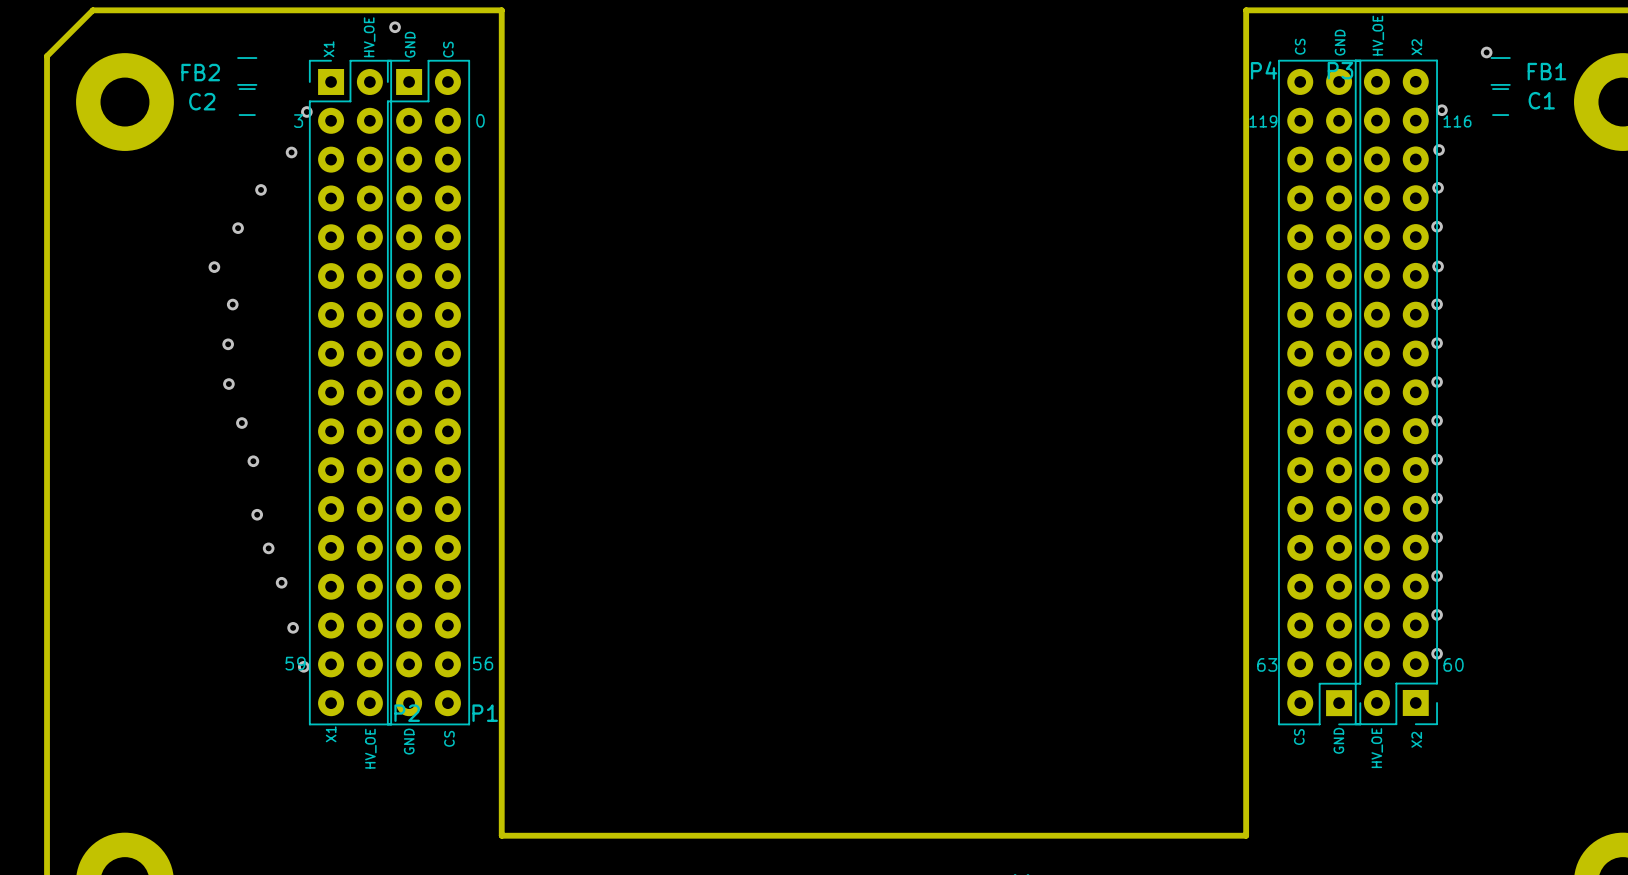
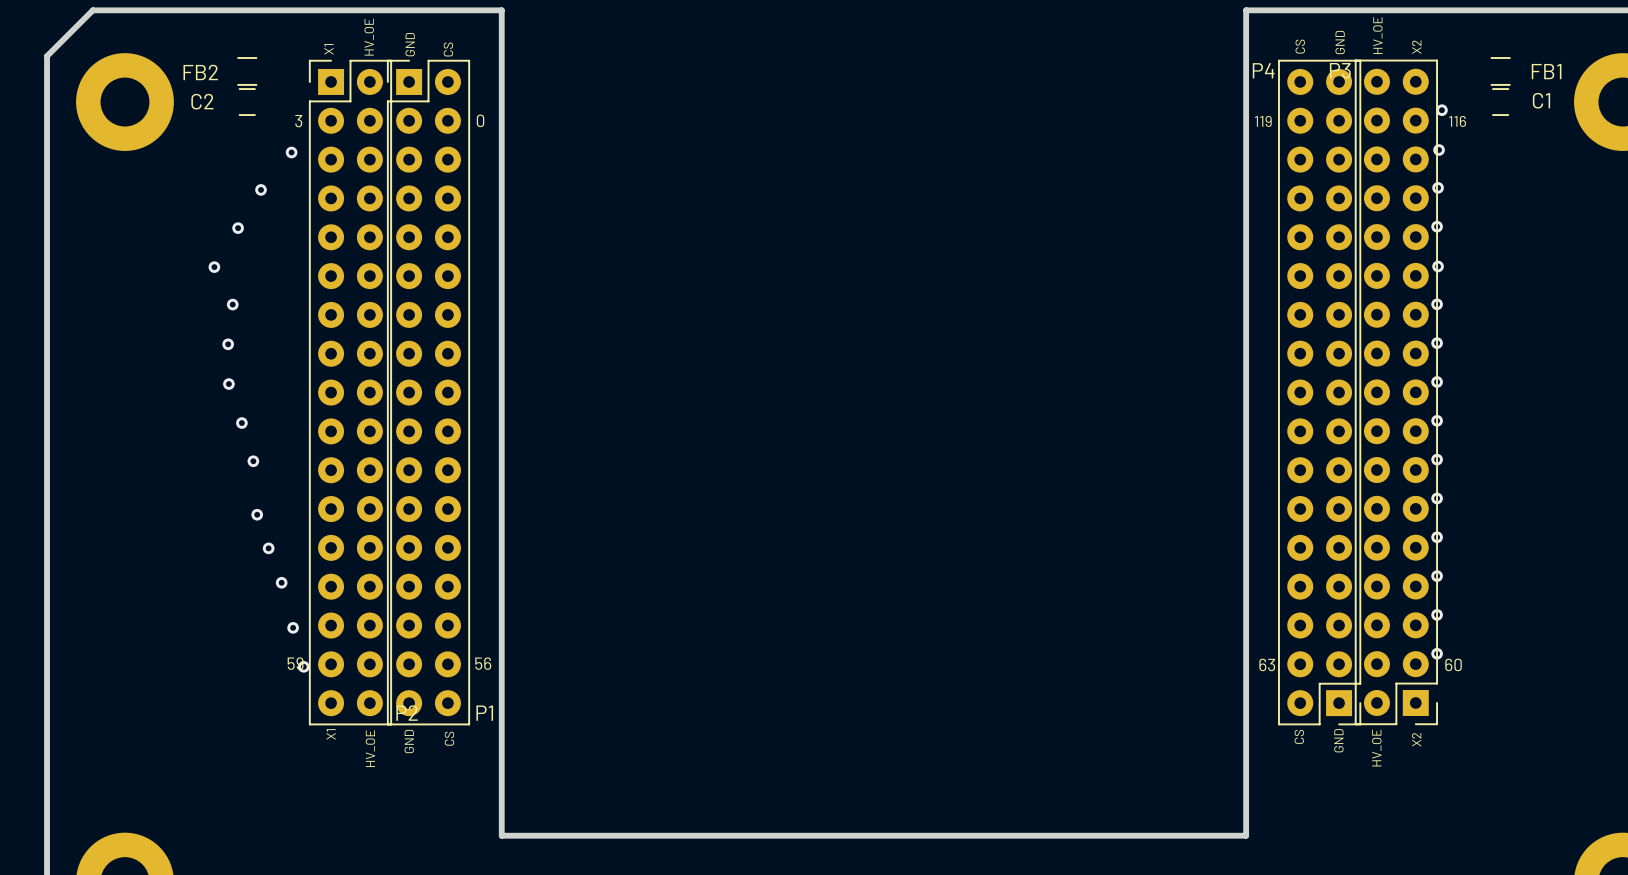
via: (395, 27) -> none
via: (1486, 52) -> none
via: (306, 111) -> none

